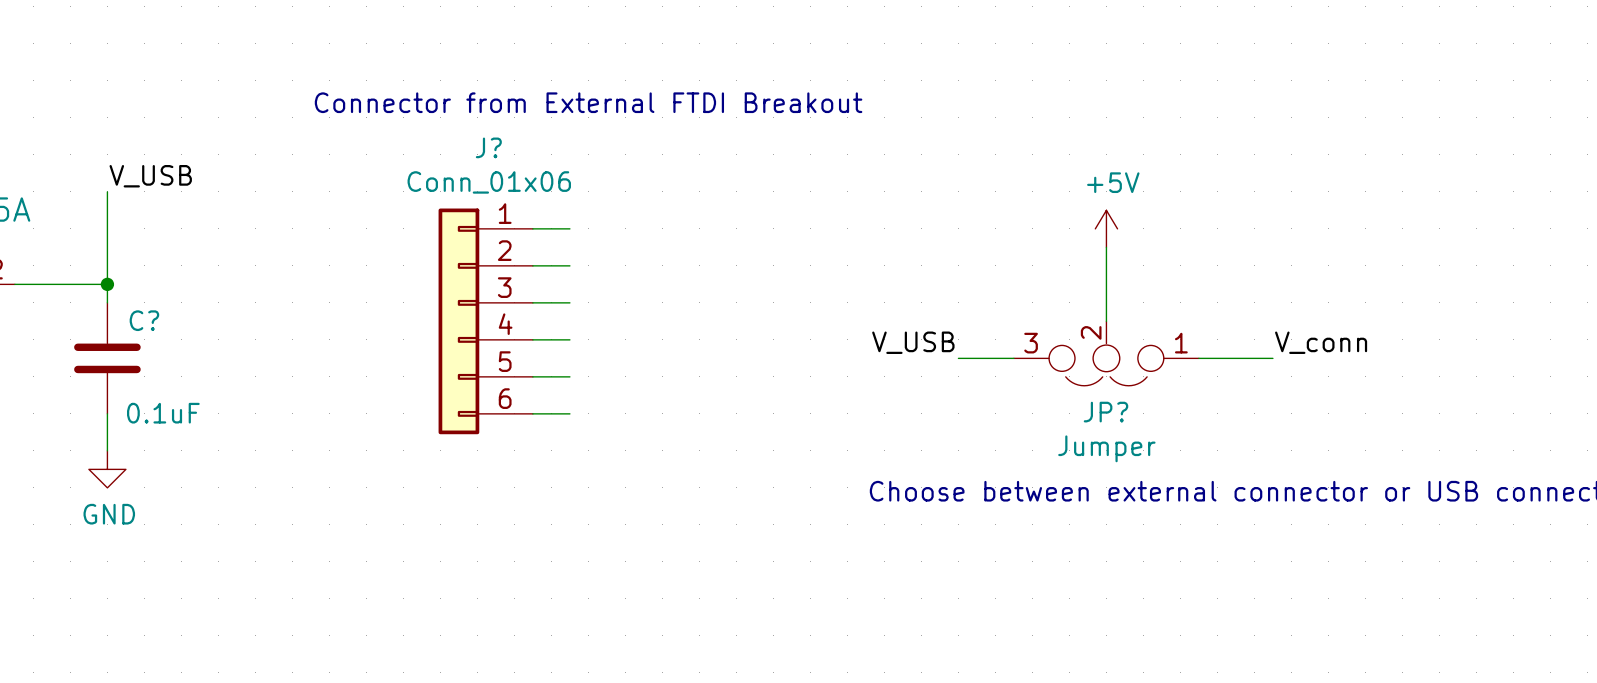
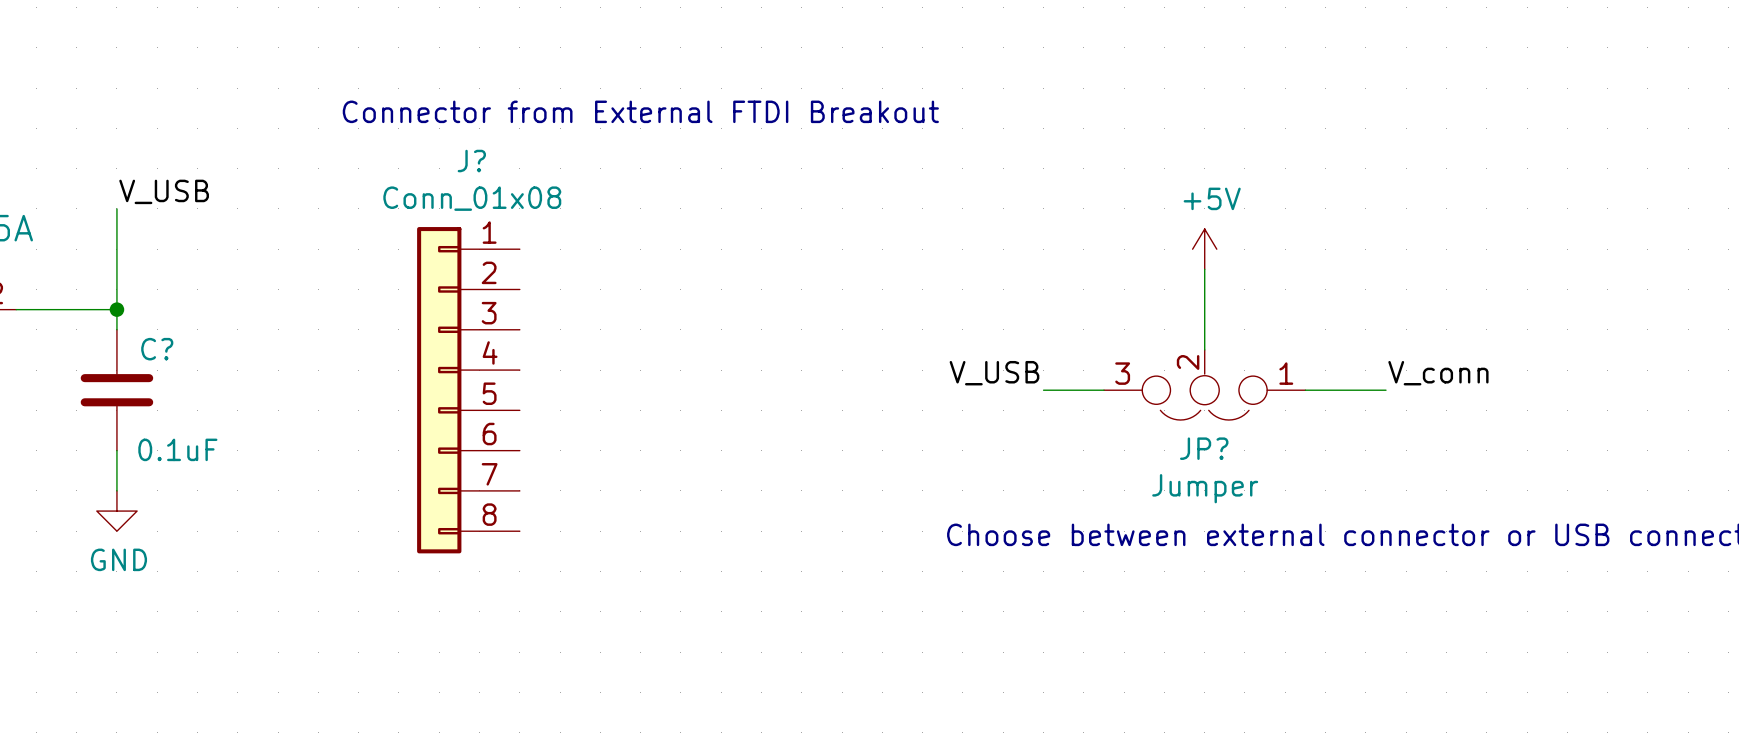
wire: (532, 228) (569, 228) -> none
wire: (532, 265) (569, 265) -> none
wire: (532, 302) (569, 302) -> none
J?: Conn_01x06 (485, 321) -> none
wire: (532, 339) (569, 339) -> none
J?: none -> Conn_01x08 (468, 390)
wire: (532, 376) (569, 376) -> none
wire: (532, 413) (569, 413) -> none

